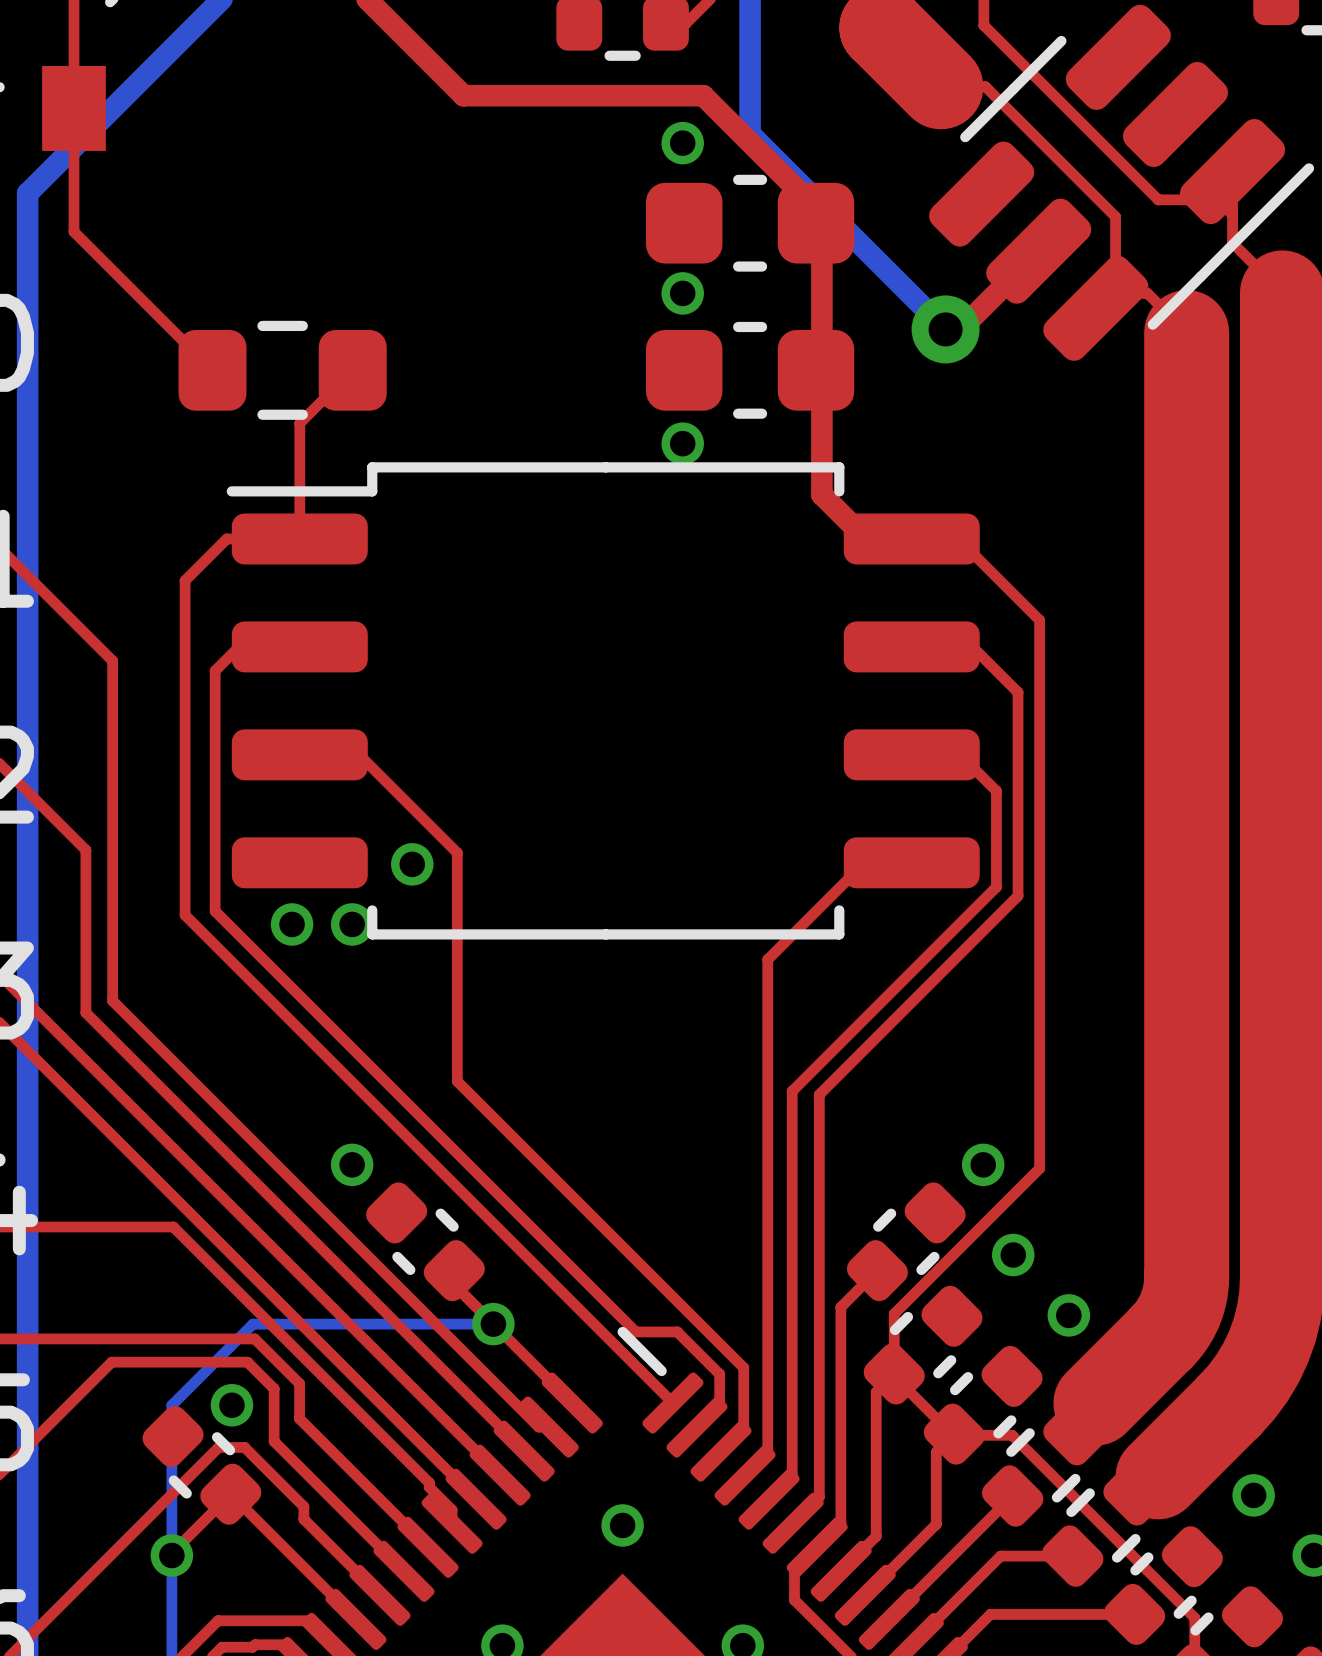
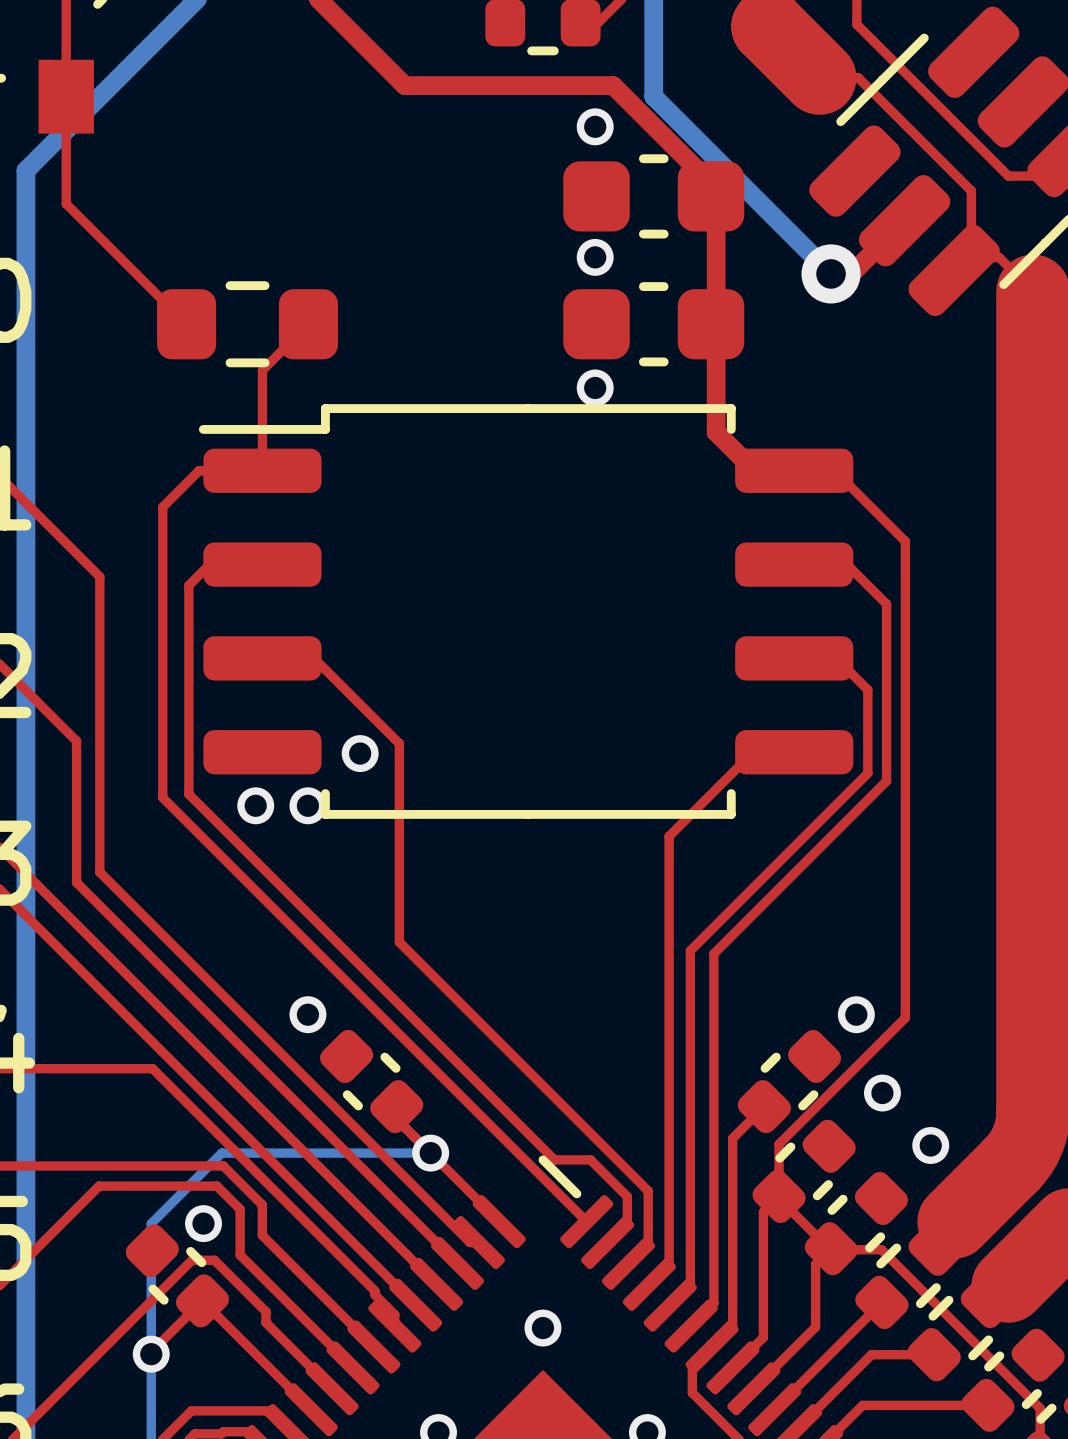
bottom track: (750, 108) (750, 133) (945, 329) -> (653, 96) (831, 273)
via position: (945, 329) -> (831, 273)

